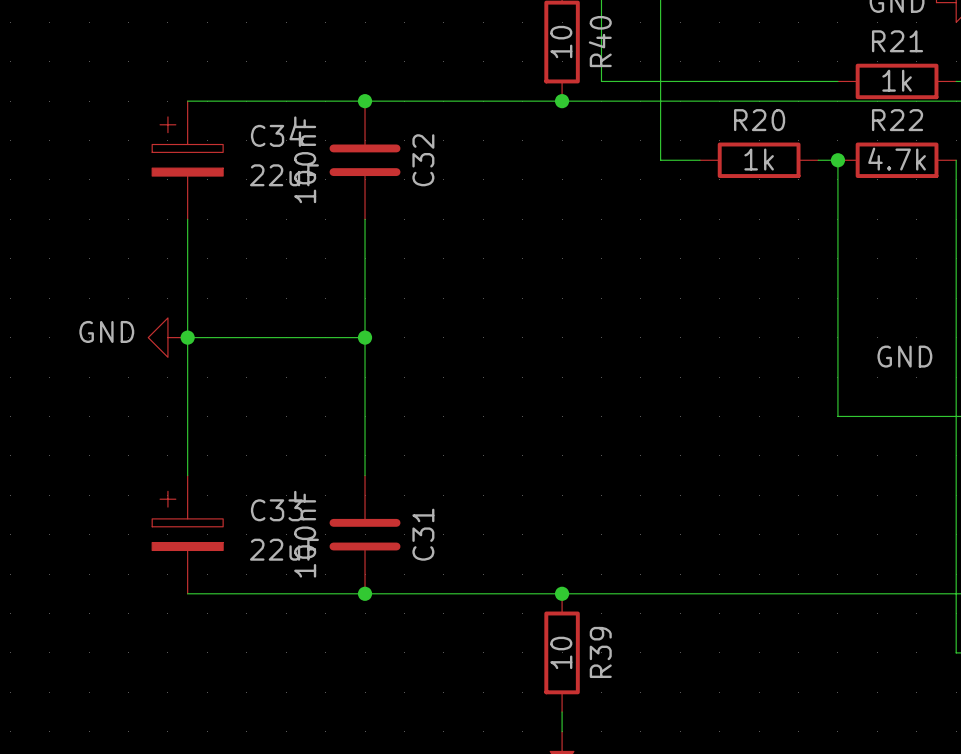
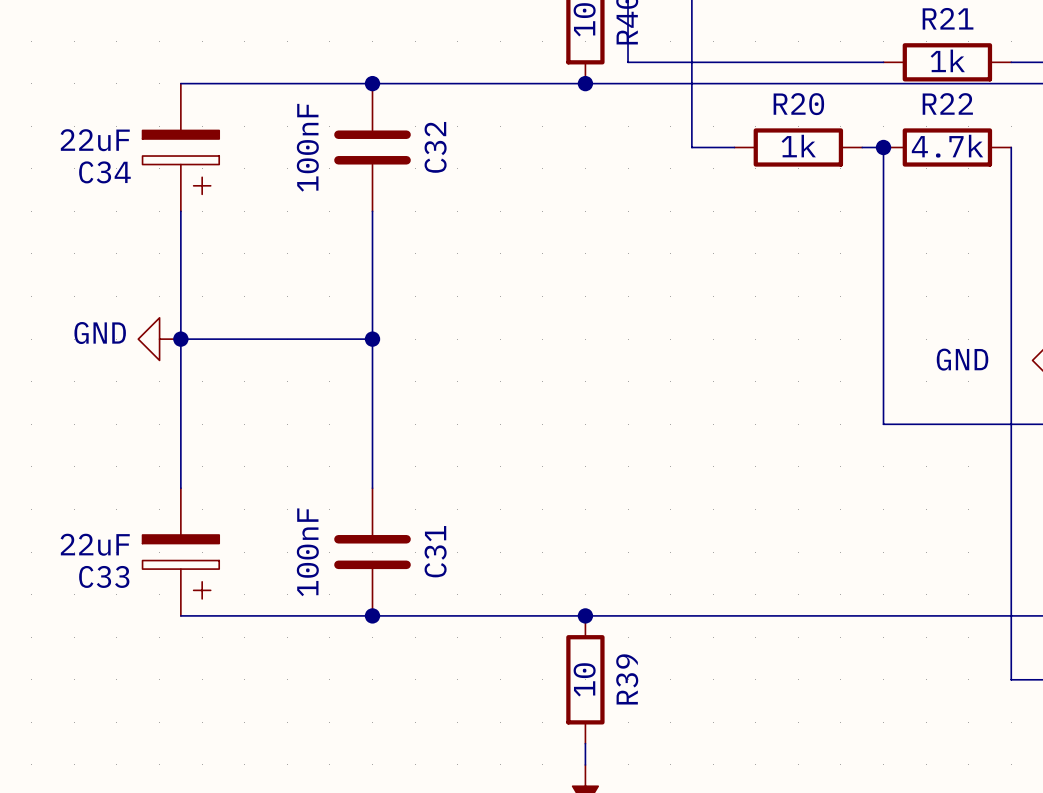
C34 rotation: 0° (187, 146) -> 180° (180, 162)
C33 rotation: 0° (187, 520) -> 180° (180, 566)

